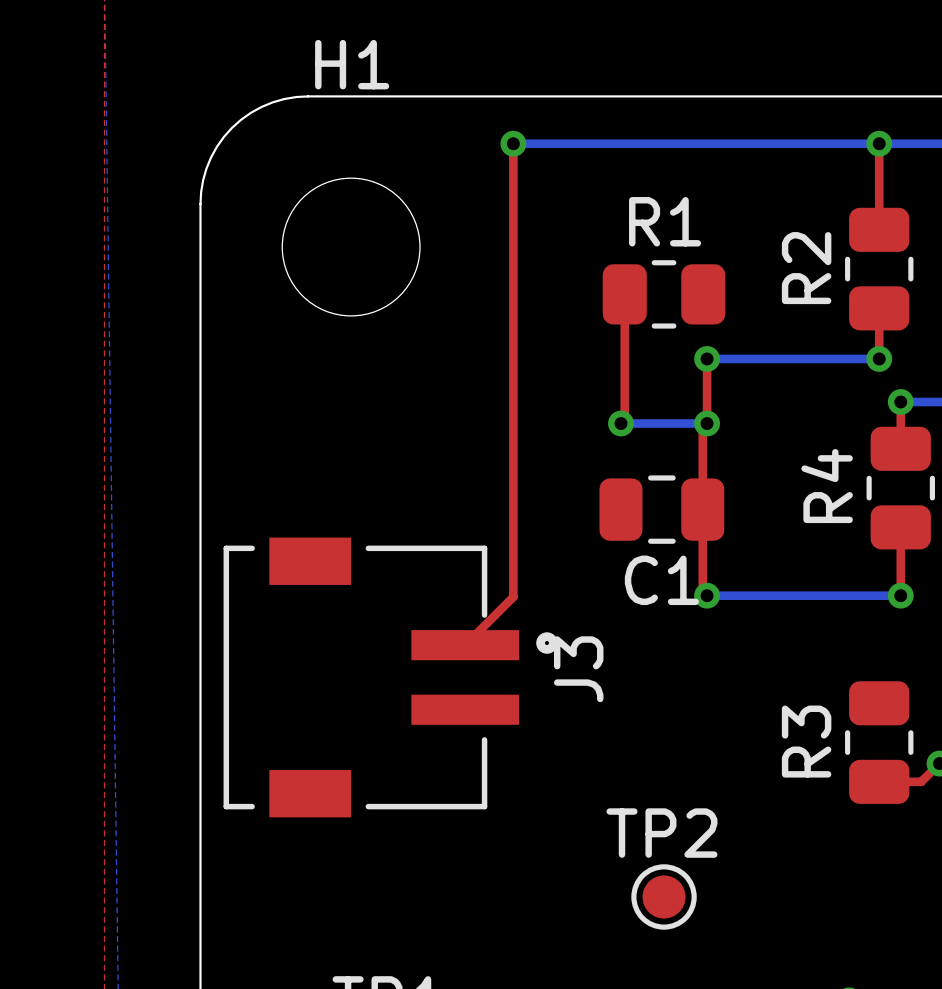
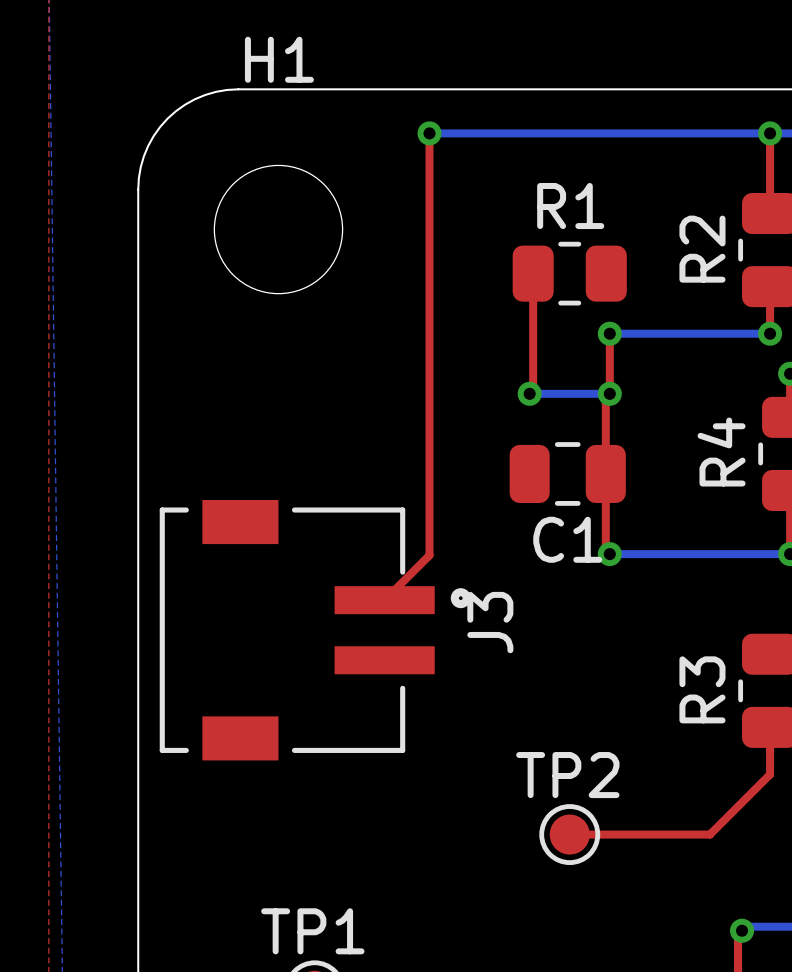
top track: none -> (770, 727) (770, 774) (709, 834) (569, 834)

